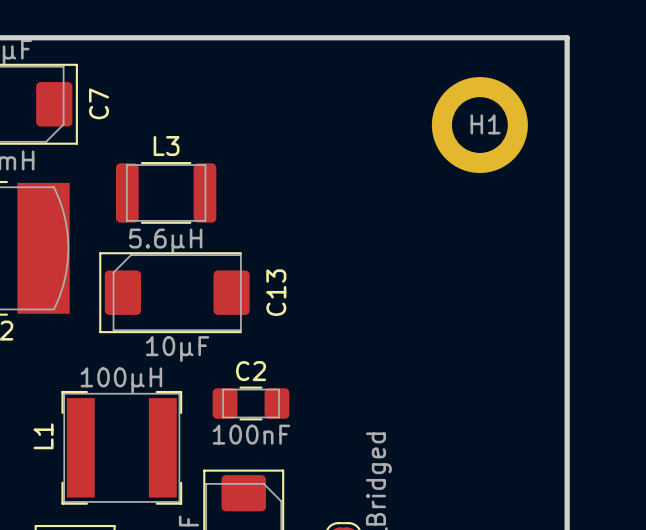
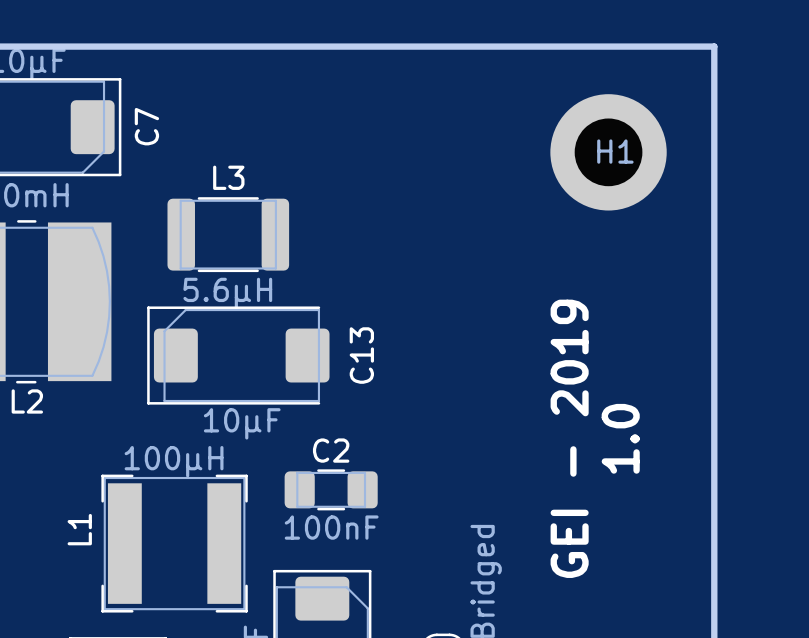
text: none -> GEI - 2019 (569, 438)
text: none -> 1.0 (620, 438)

